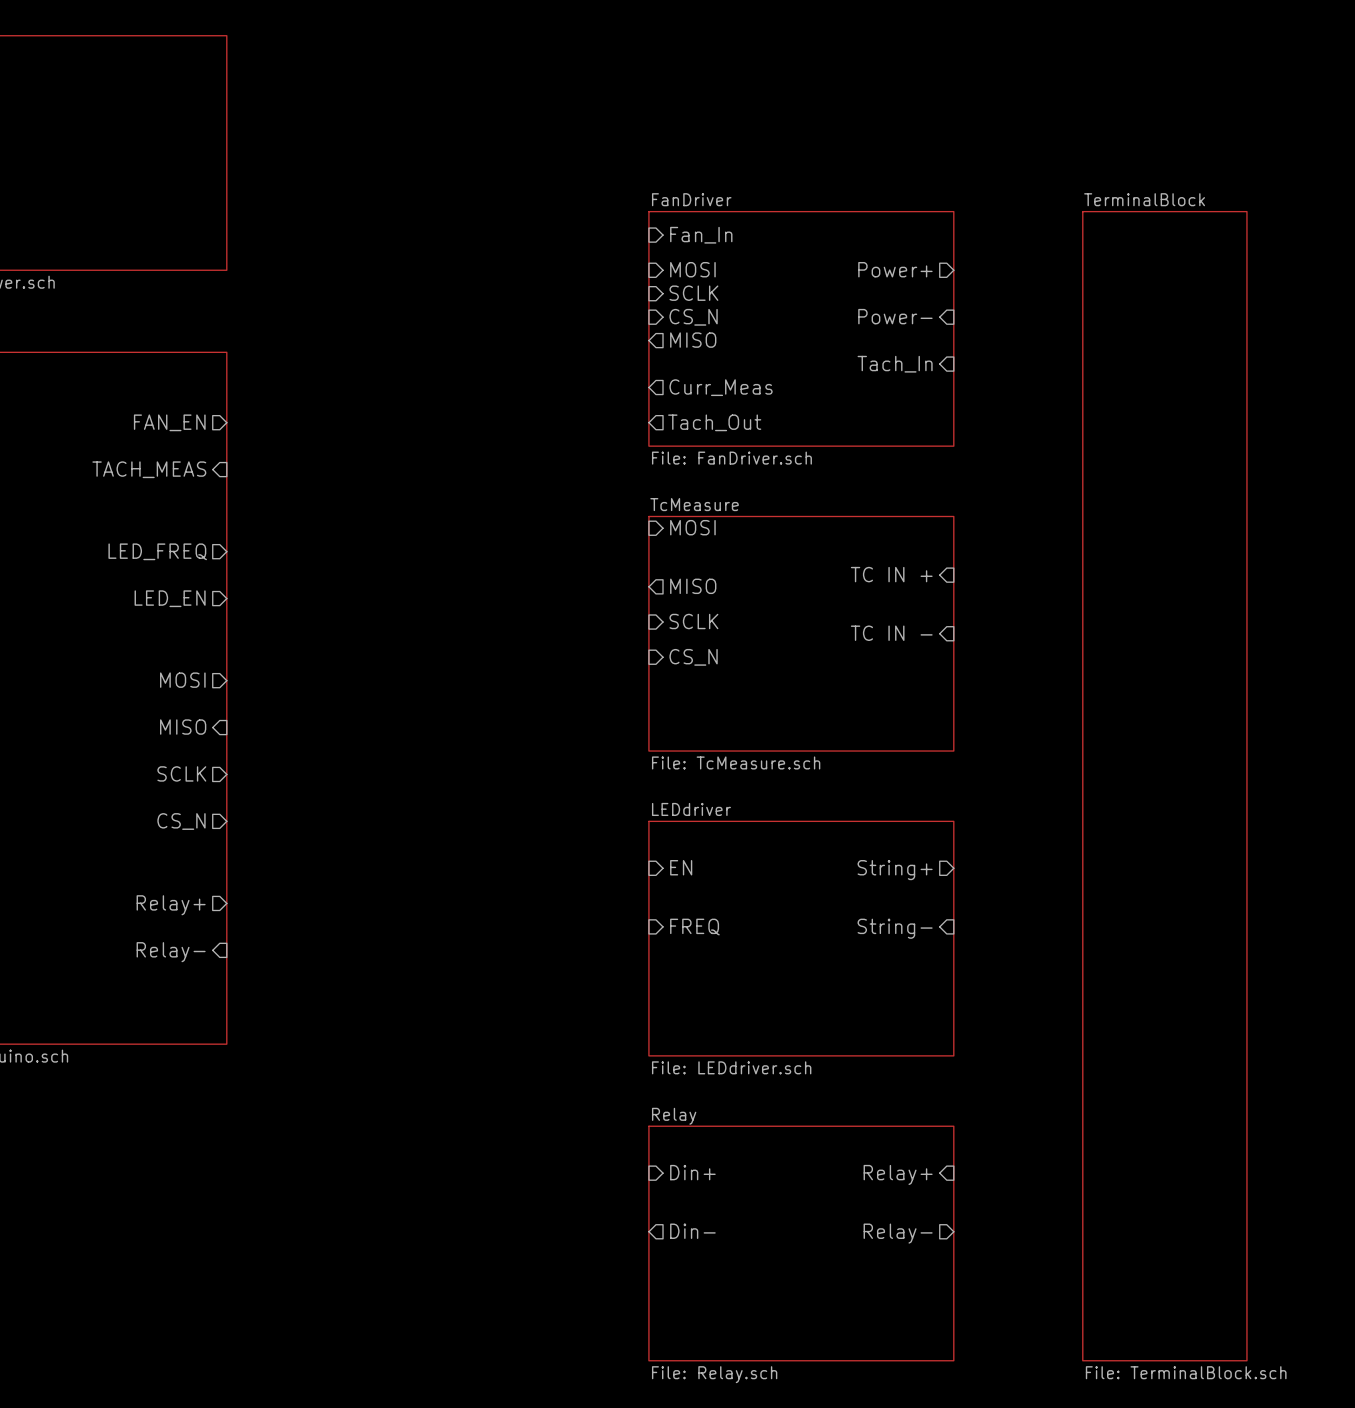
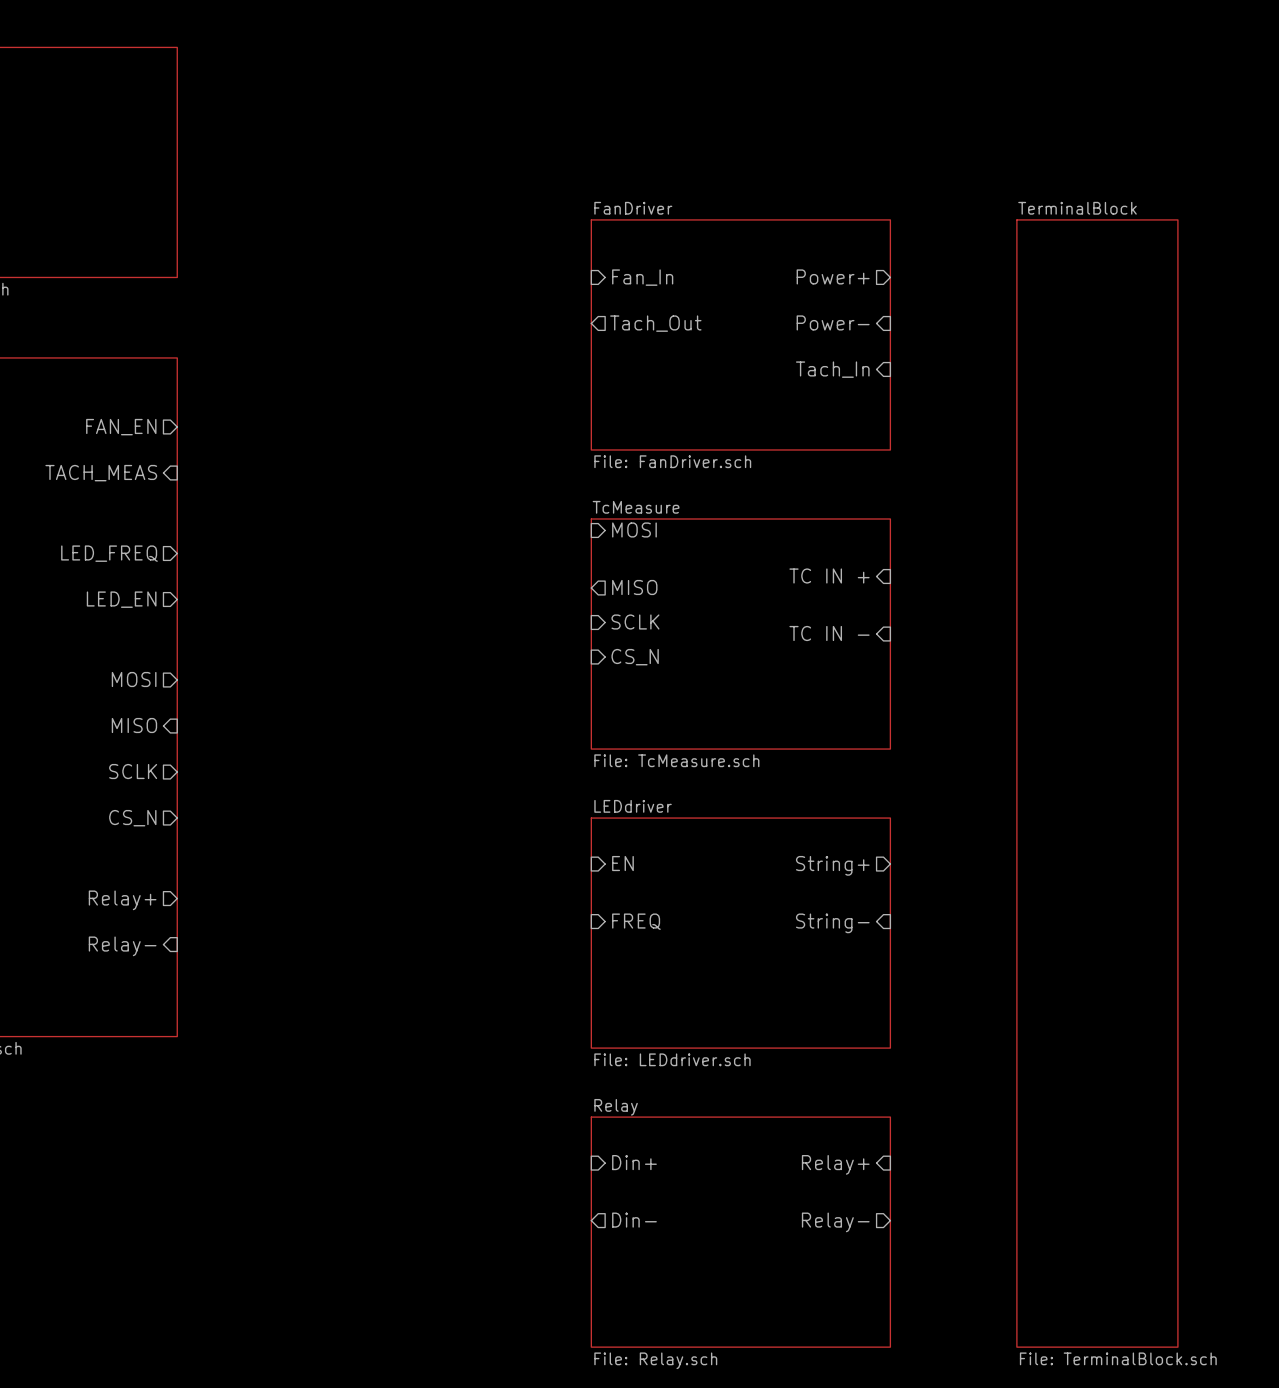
sheet pin: Fan_In (701, 235) -> none
sheet pin: MOSI (692, 269) -> Fan_In (642, 277)
sheet pin: SCLK (693, 293) -> none
sheet pin shape: input (693, 317) -> output (655, 323)
sheet pin: CS_N (693, 317) -> Tach_Out (655, 323)
sheet pin: MISO (693, 340) -> none
sheet pin: Curr_Meas (721, 387) -> none
sheet pin: Tach_Out (714, 422) -> none

